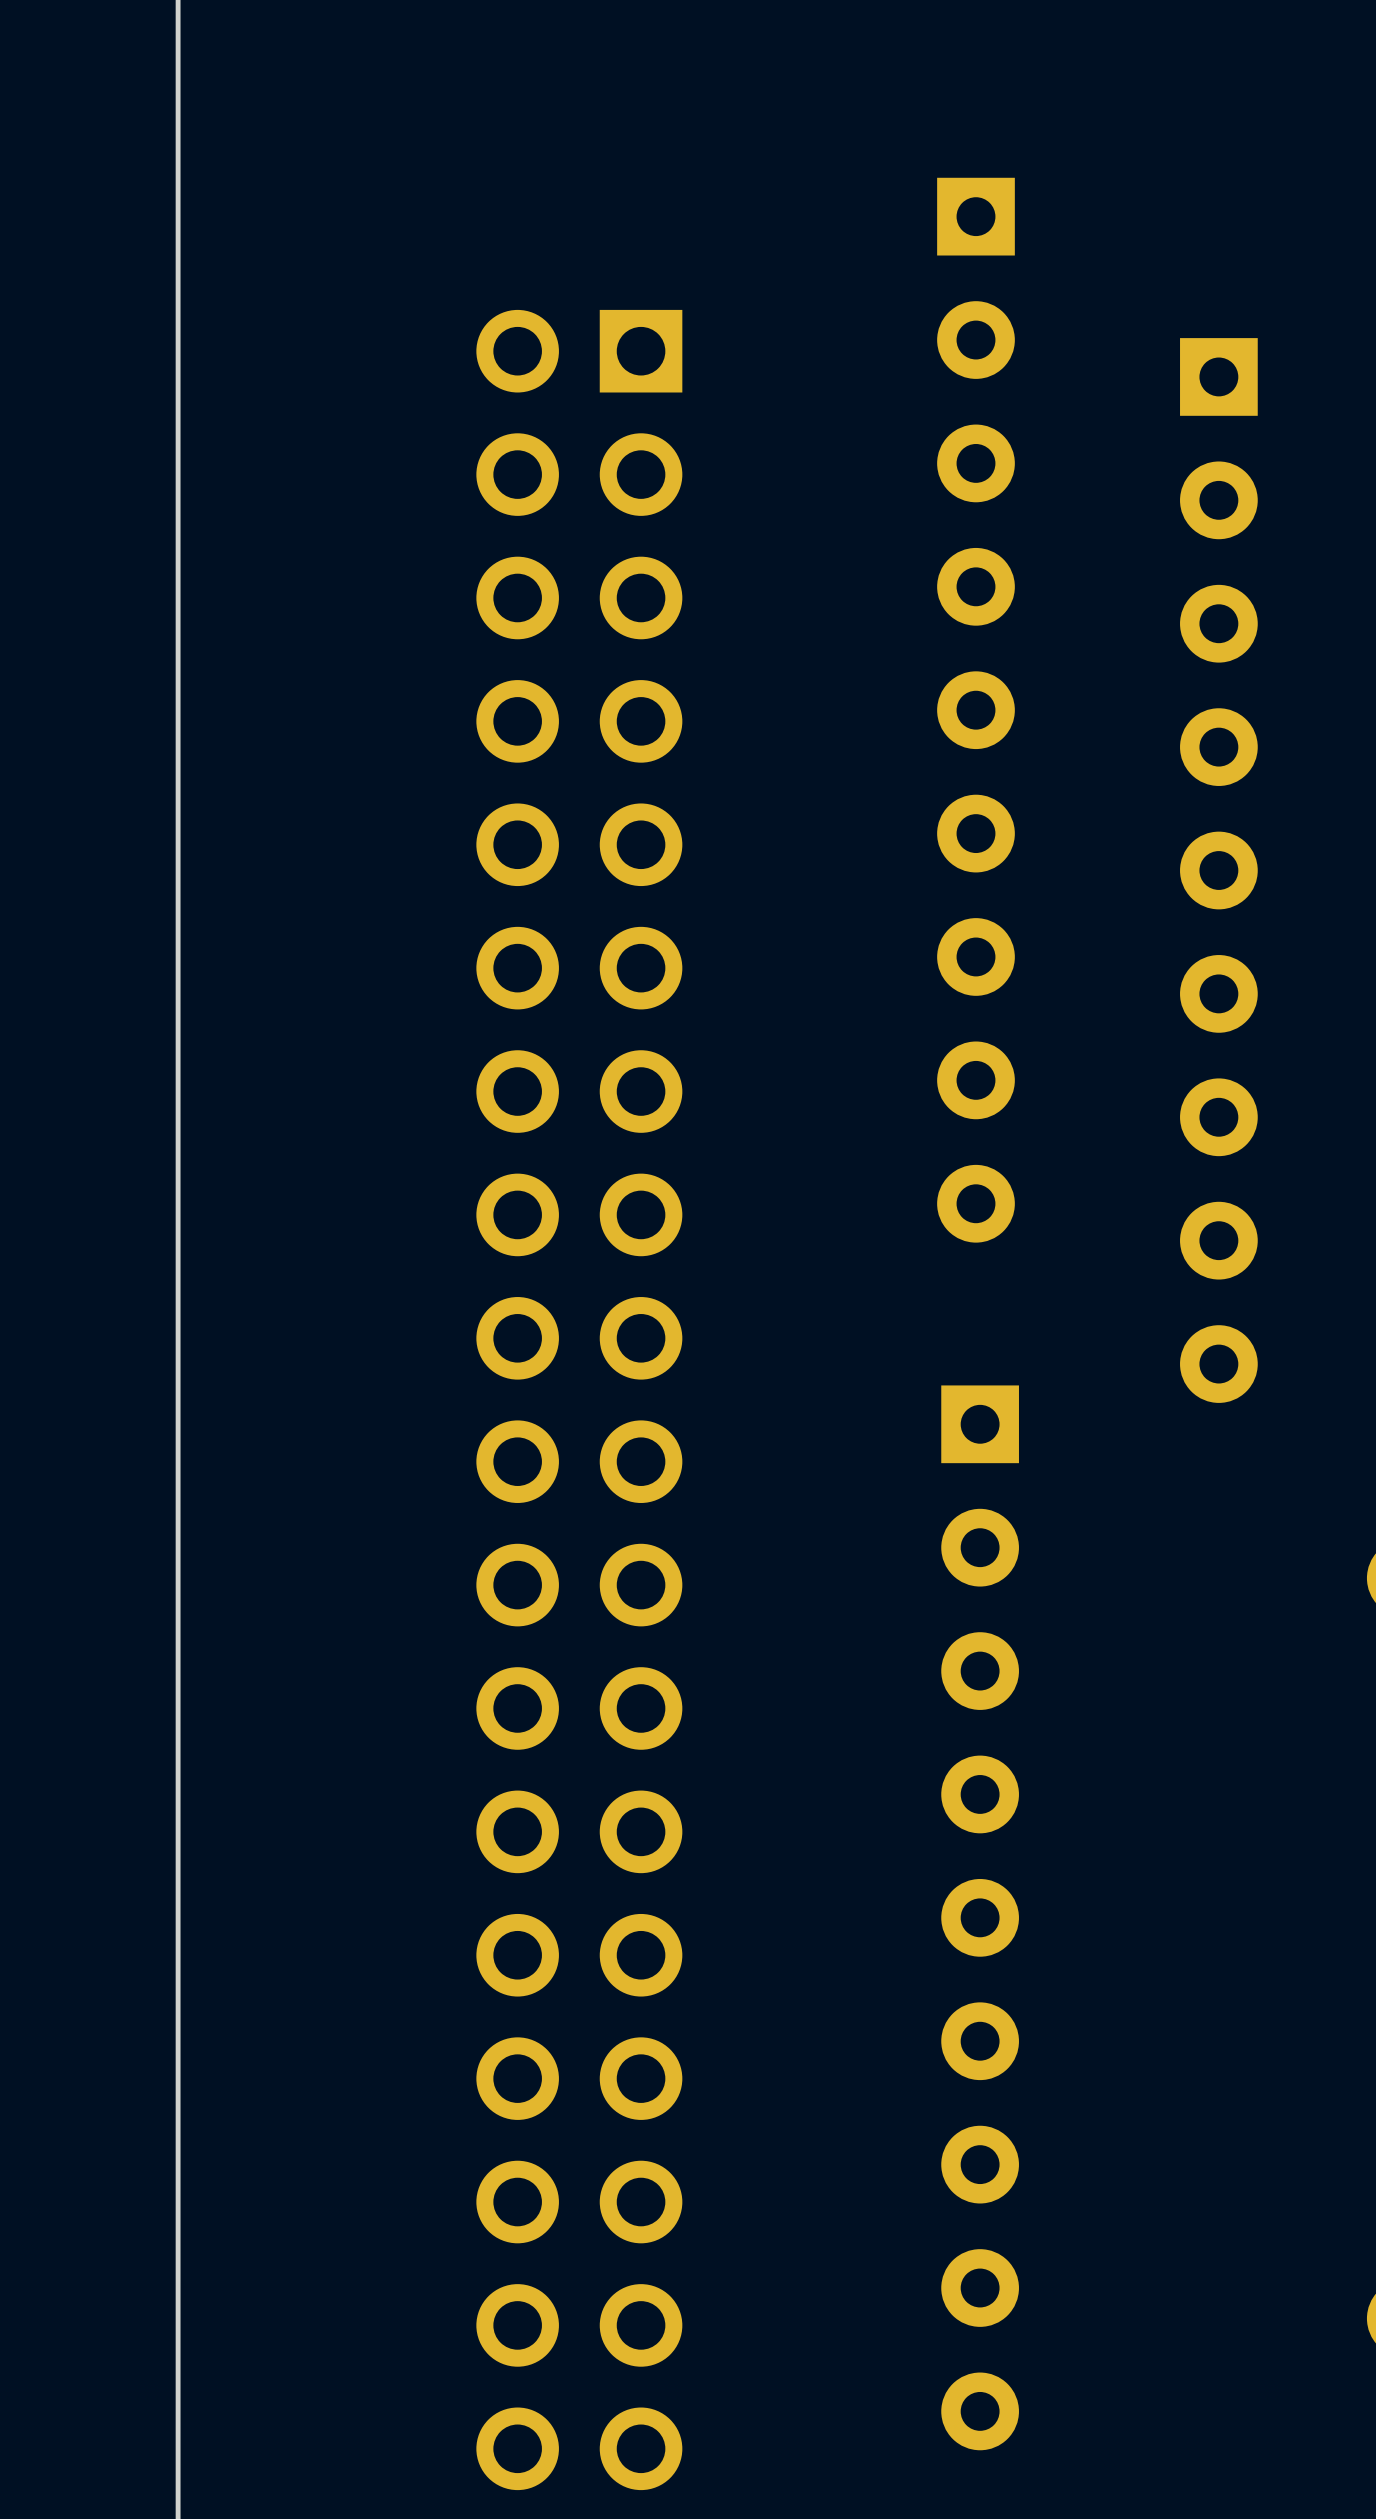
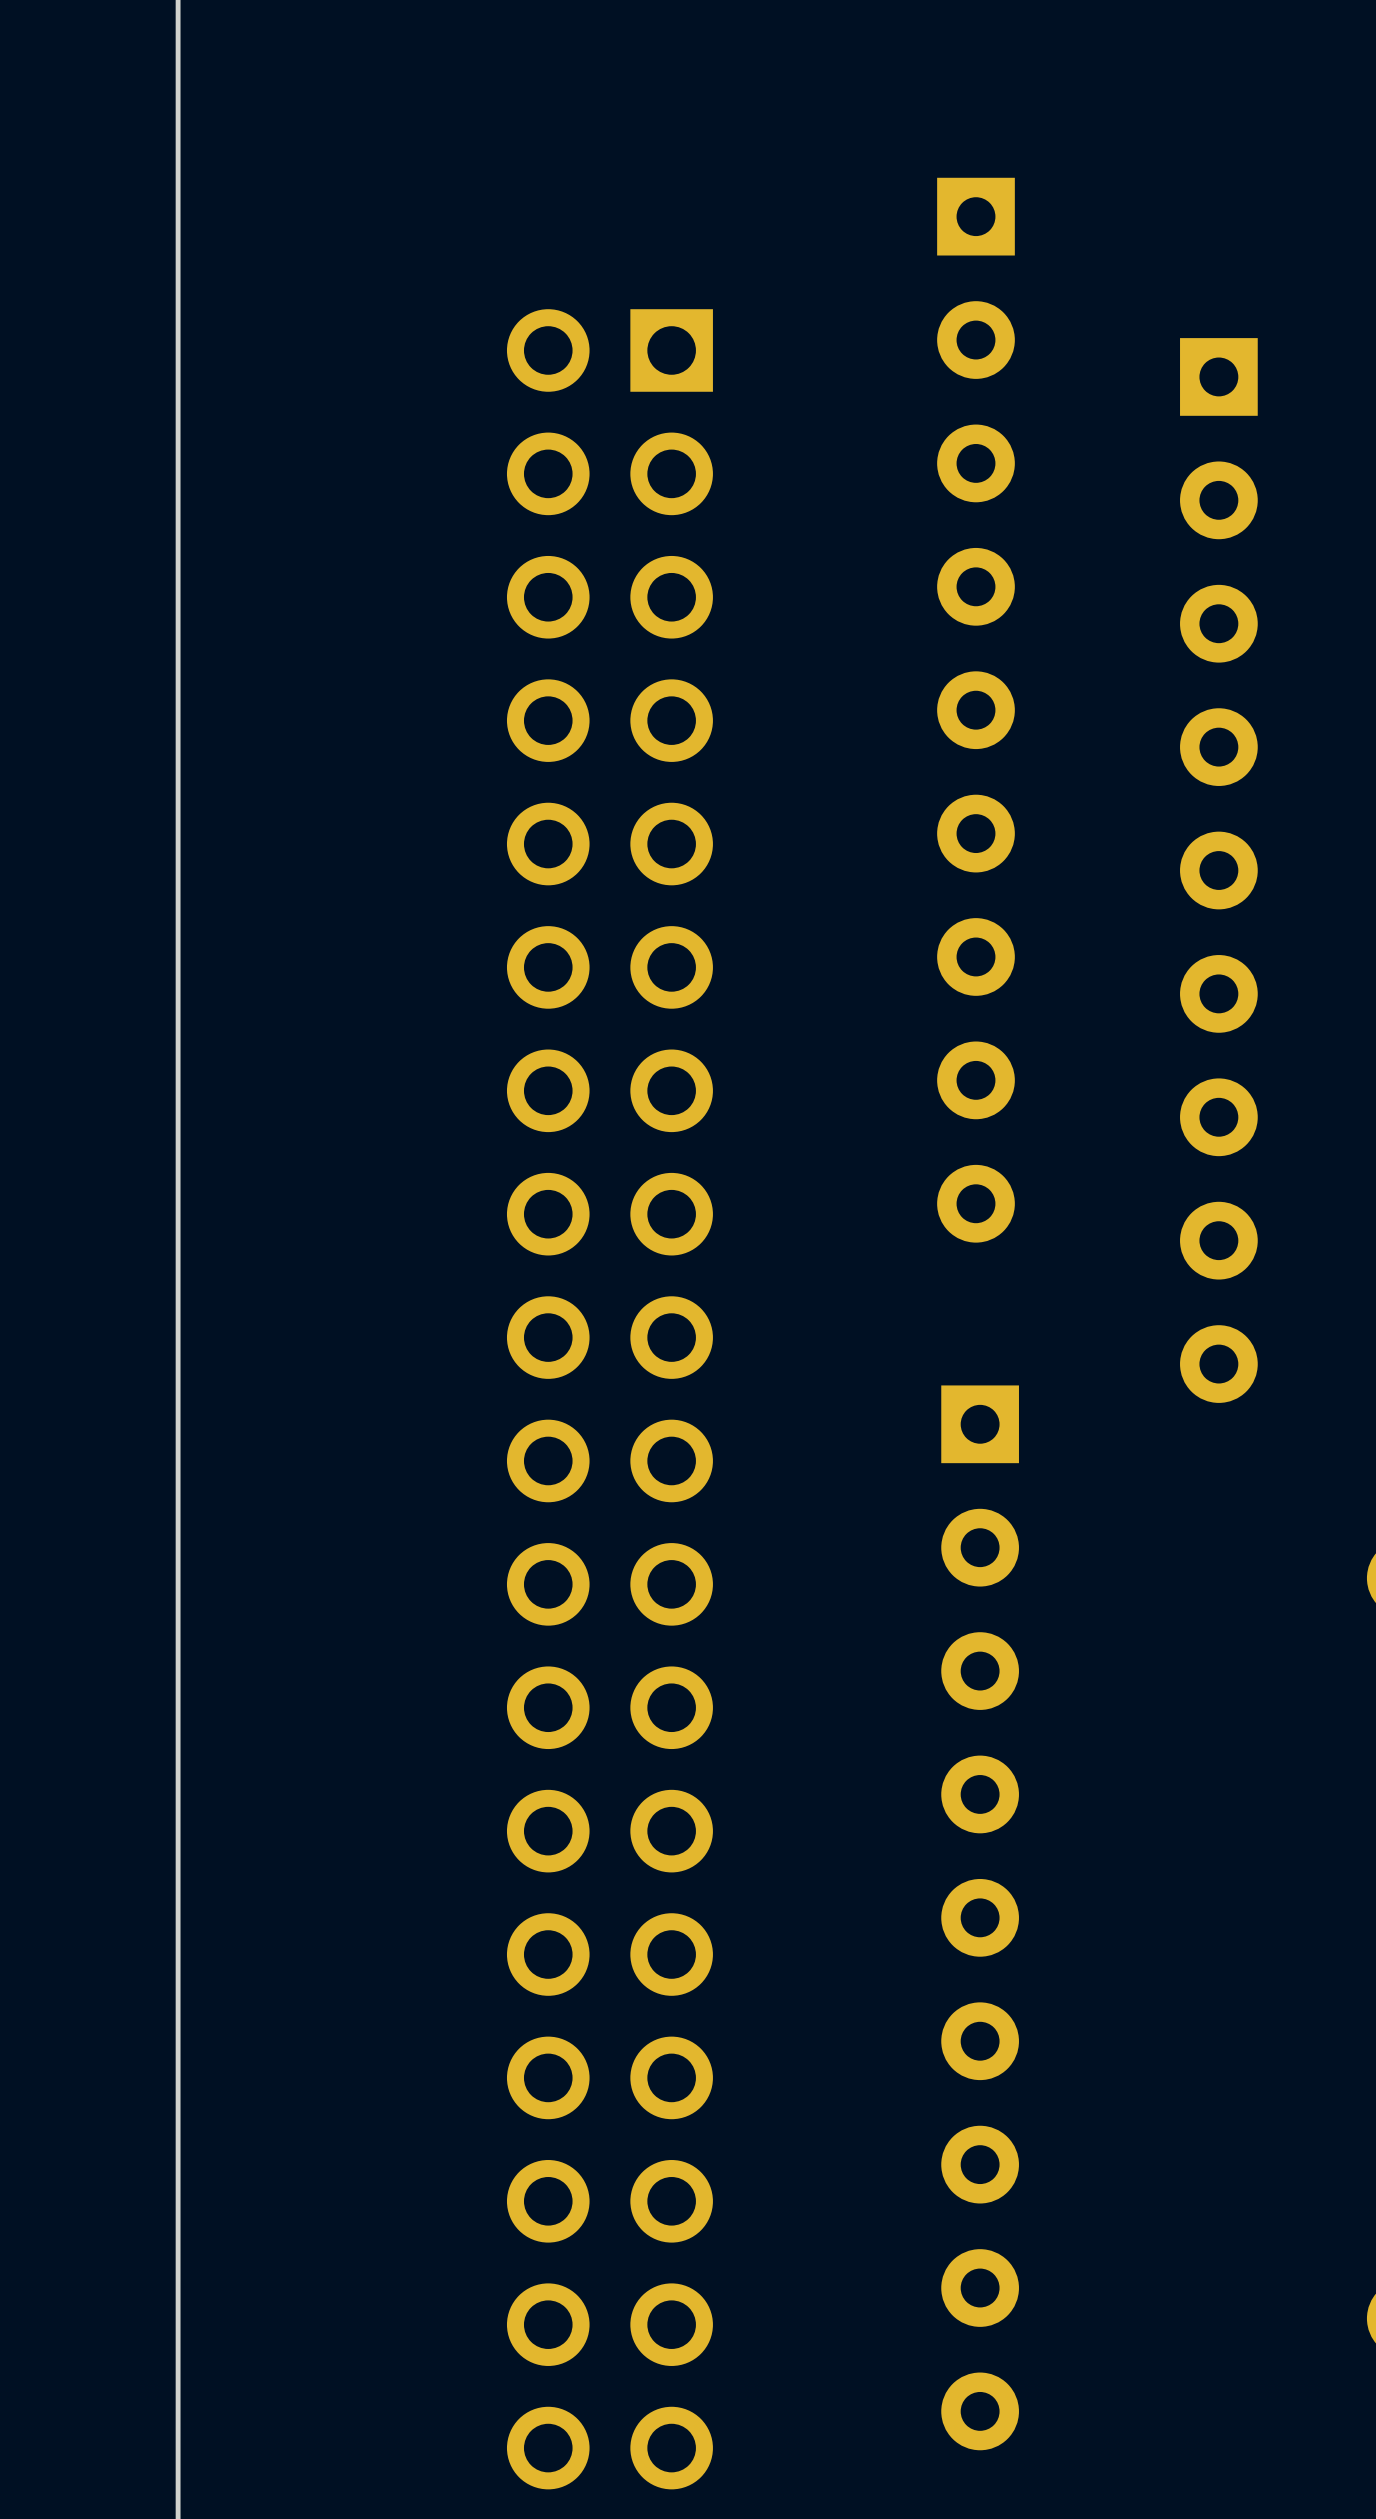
part position: (579, 1400) -> (609, 1399)

